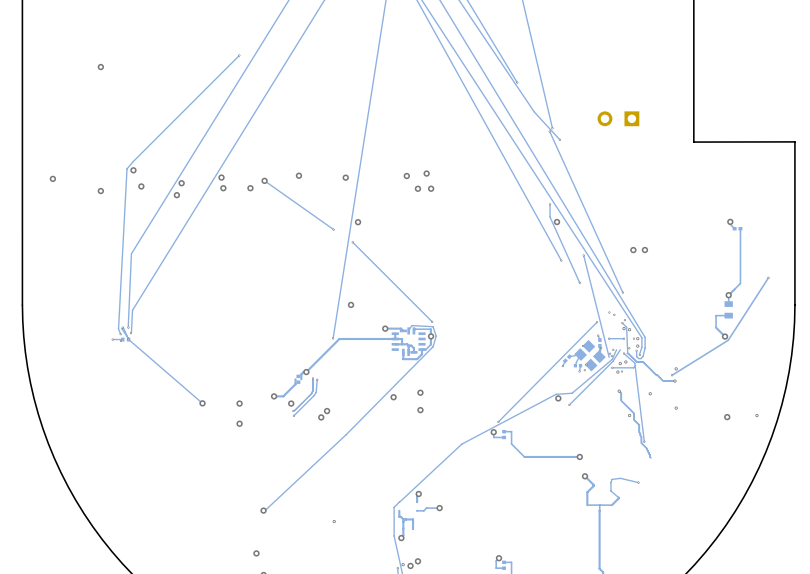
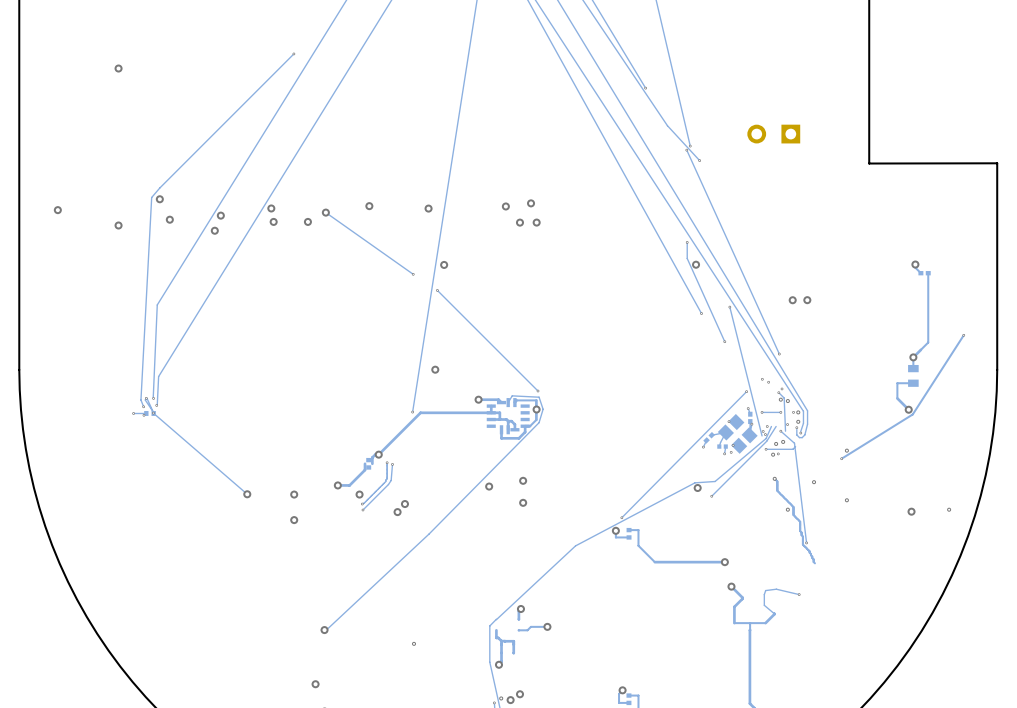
track: (627, 353) (636, 362) (643, 362) (663, 381) (675, 381) -> none
via: (675, 381) -> none

